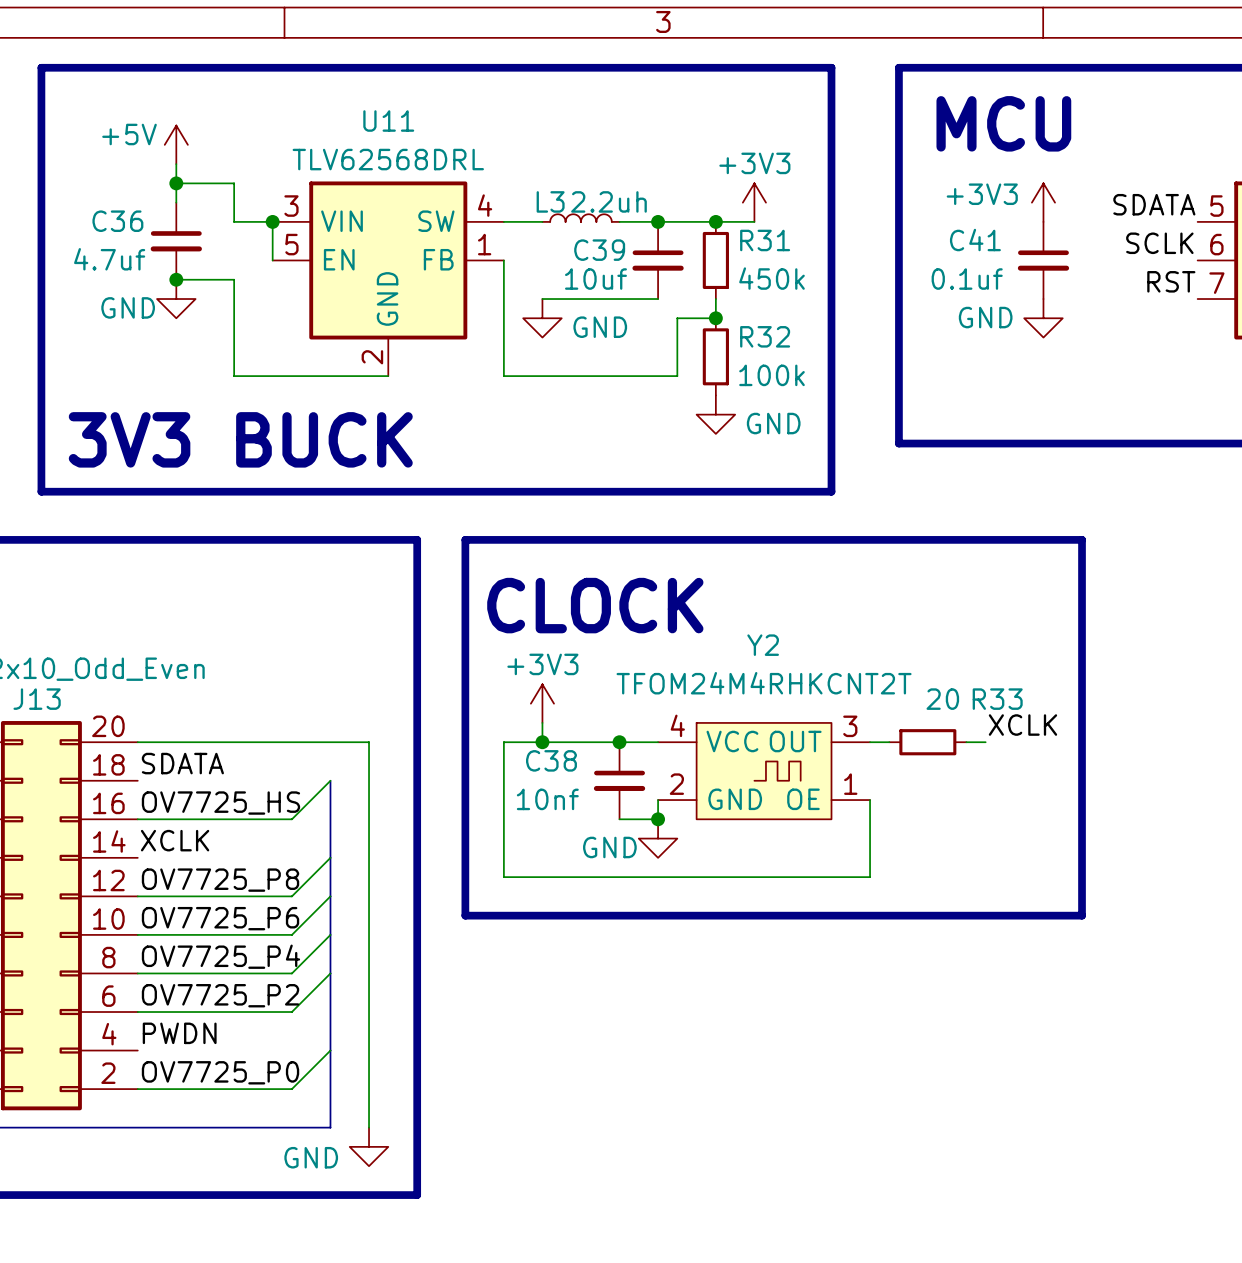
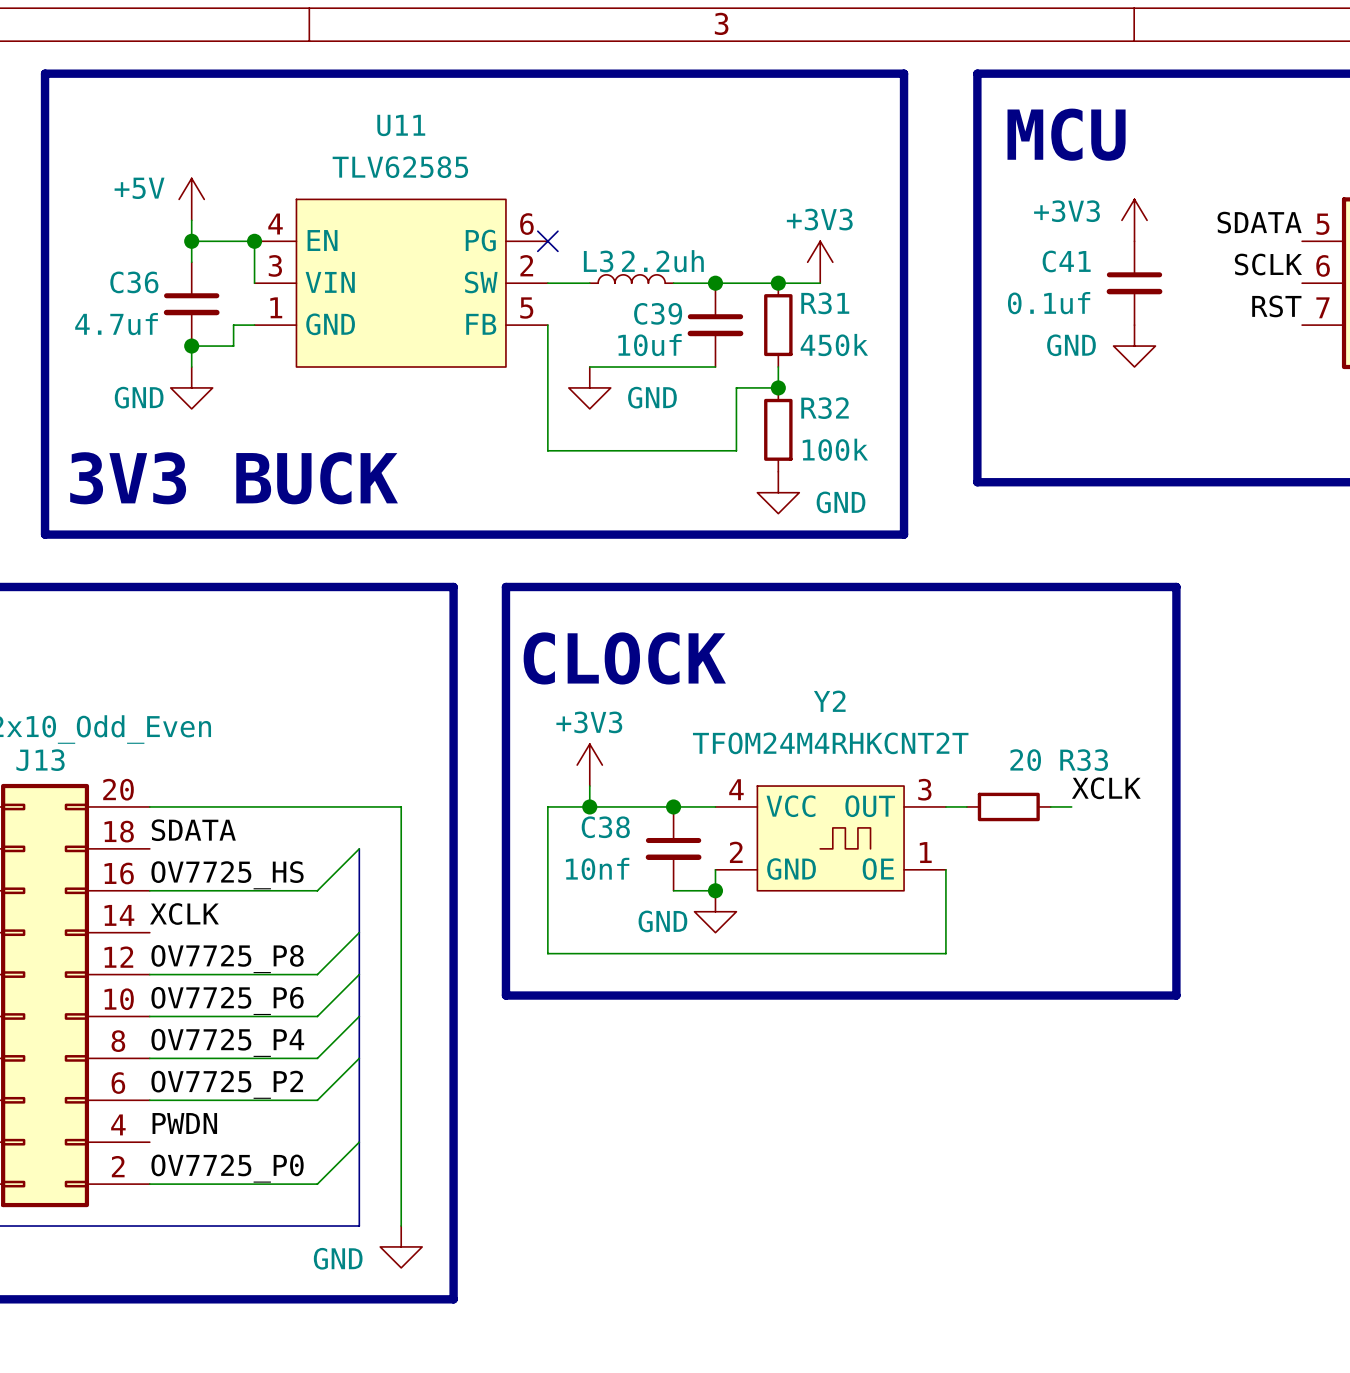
power symbol position: +5V (176, 144) -> +5V (191, 199)
U11 value: TLV62568DRL (388, 159) -> TLV62585 (400, 167)
U11 symbol: [272, 181, 504, 377] -> [254, 199, 548, 368]
wire: (176, 183) (234, 183) (234, 221) (272, 221) (272, 260) -> none
junction: (176, 183) -> none
power symbol position: +3V3 (754, 202) -> +3V3 (820, 262)
L3 position: (580, 218) -> (631, 279)
wire: none -> (191, 241) (254, 241) (254, 283)
junction: none -> (191, 241)
junction: none -> (254, 241)
junction: (272, 221) -> none
wire: (503, 221) (542, 221) -> none
no-connect mark: none -> (547, 241)
wire: (619, 221) (754, 221) -> (673, 283) (820, 283)
junction: (658, 221) -> none
junction: (715, 221) -> none
C36 position: (176, 241) -> (191, 304)
wire: (503, 260) (503, 299) -> (547, 283) (589, 283)
junction: none -> (715, 283)
C39 position: (658, 260) -> (715, 325)
junction: none -> (778, 283)
R31 position: (715, 260) -> (778, 325)
wire: (176, 279) (234, 279) (234, 376) (388, 376) -> none
junction: (176, 279) -> none
power symbol position: GND (176, 299) -> GND (191, 387)
wire: none -> (254, 325) (233, 325) (233, 346) (191, 346) (191, 367)
wire: (542, 299) (658, 299) -> (589, 367) (715, 367)
wire: (715, 299) (715, 318) (677, 318) (677, 356) -> (778, 367) (778, 387) (736, 387)
junction: none -> (191, 346)
power symbol position: GND (542, 318) -> GND (589, 387)
junction: (715, 318) -> none
junction: none -> (778, 387)
R32 position: (715, 356) -> (778, 429)
wire: (503, 376) (677, 376) -> (547, 408) (547, 450) (736, 450) (736, 408)
power symbol position: GND (715, 414) -> GND (778, 492)

